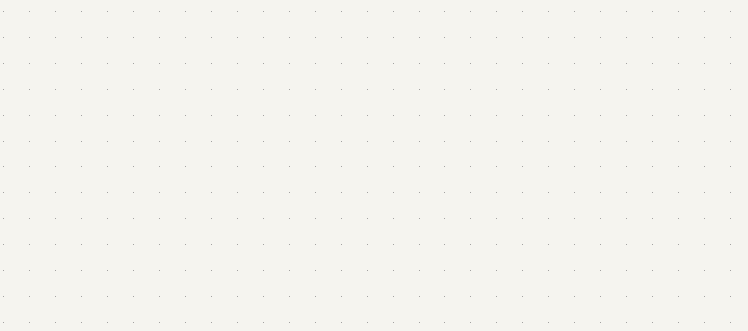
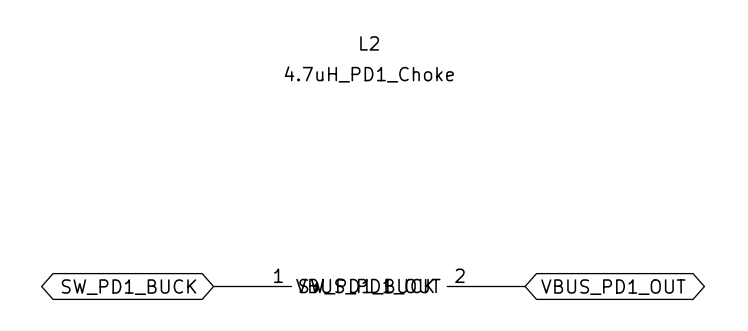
wire: none -> (213, 286) (265, 286)
L2: none -> 4.7uH_PD1_Choke (369, 286)
wire: none -> (473, 286) (525, 286)
global label: none -> SW_PD1_BUCK (128, 287)
global label: none -> VBUS_PD1_OUT (613, 287)

